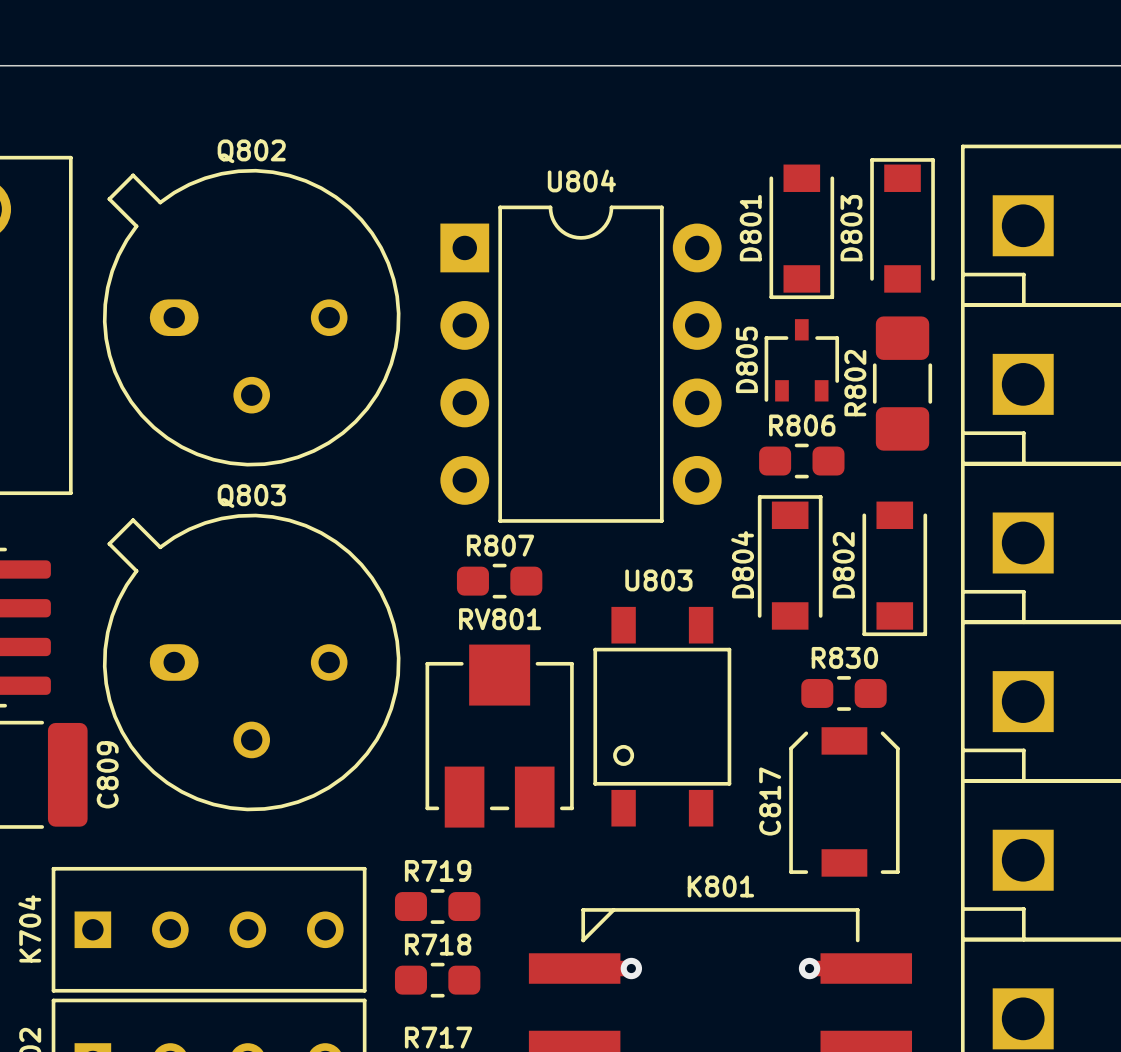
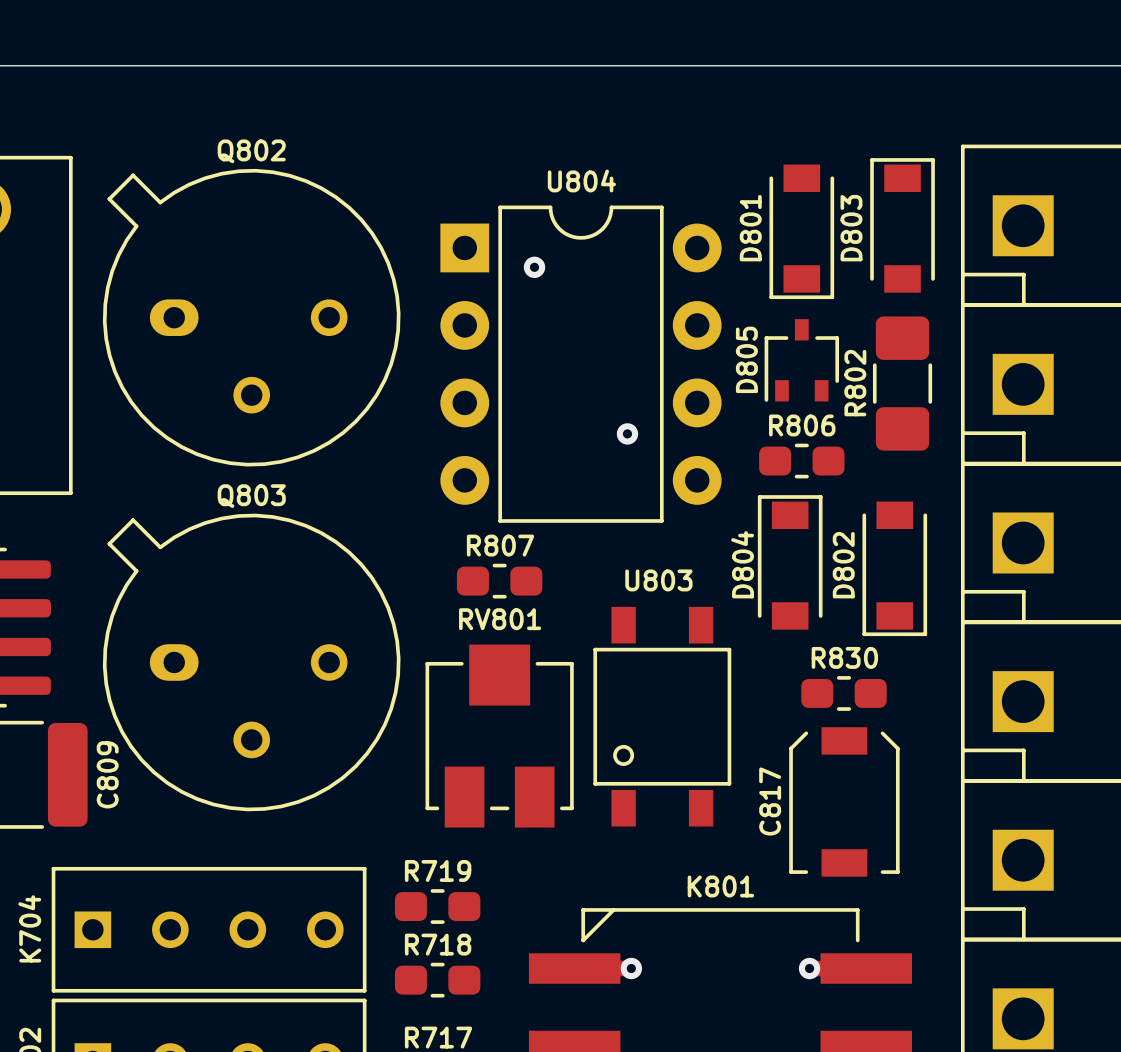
via: none -> (534, 267)
via: none -> (627, 433)

